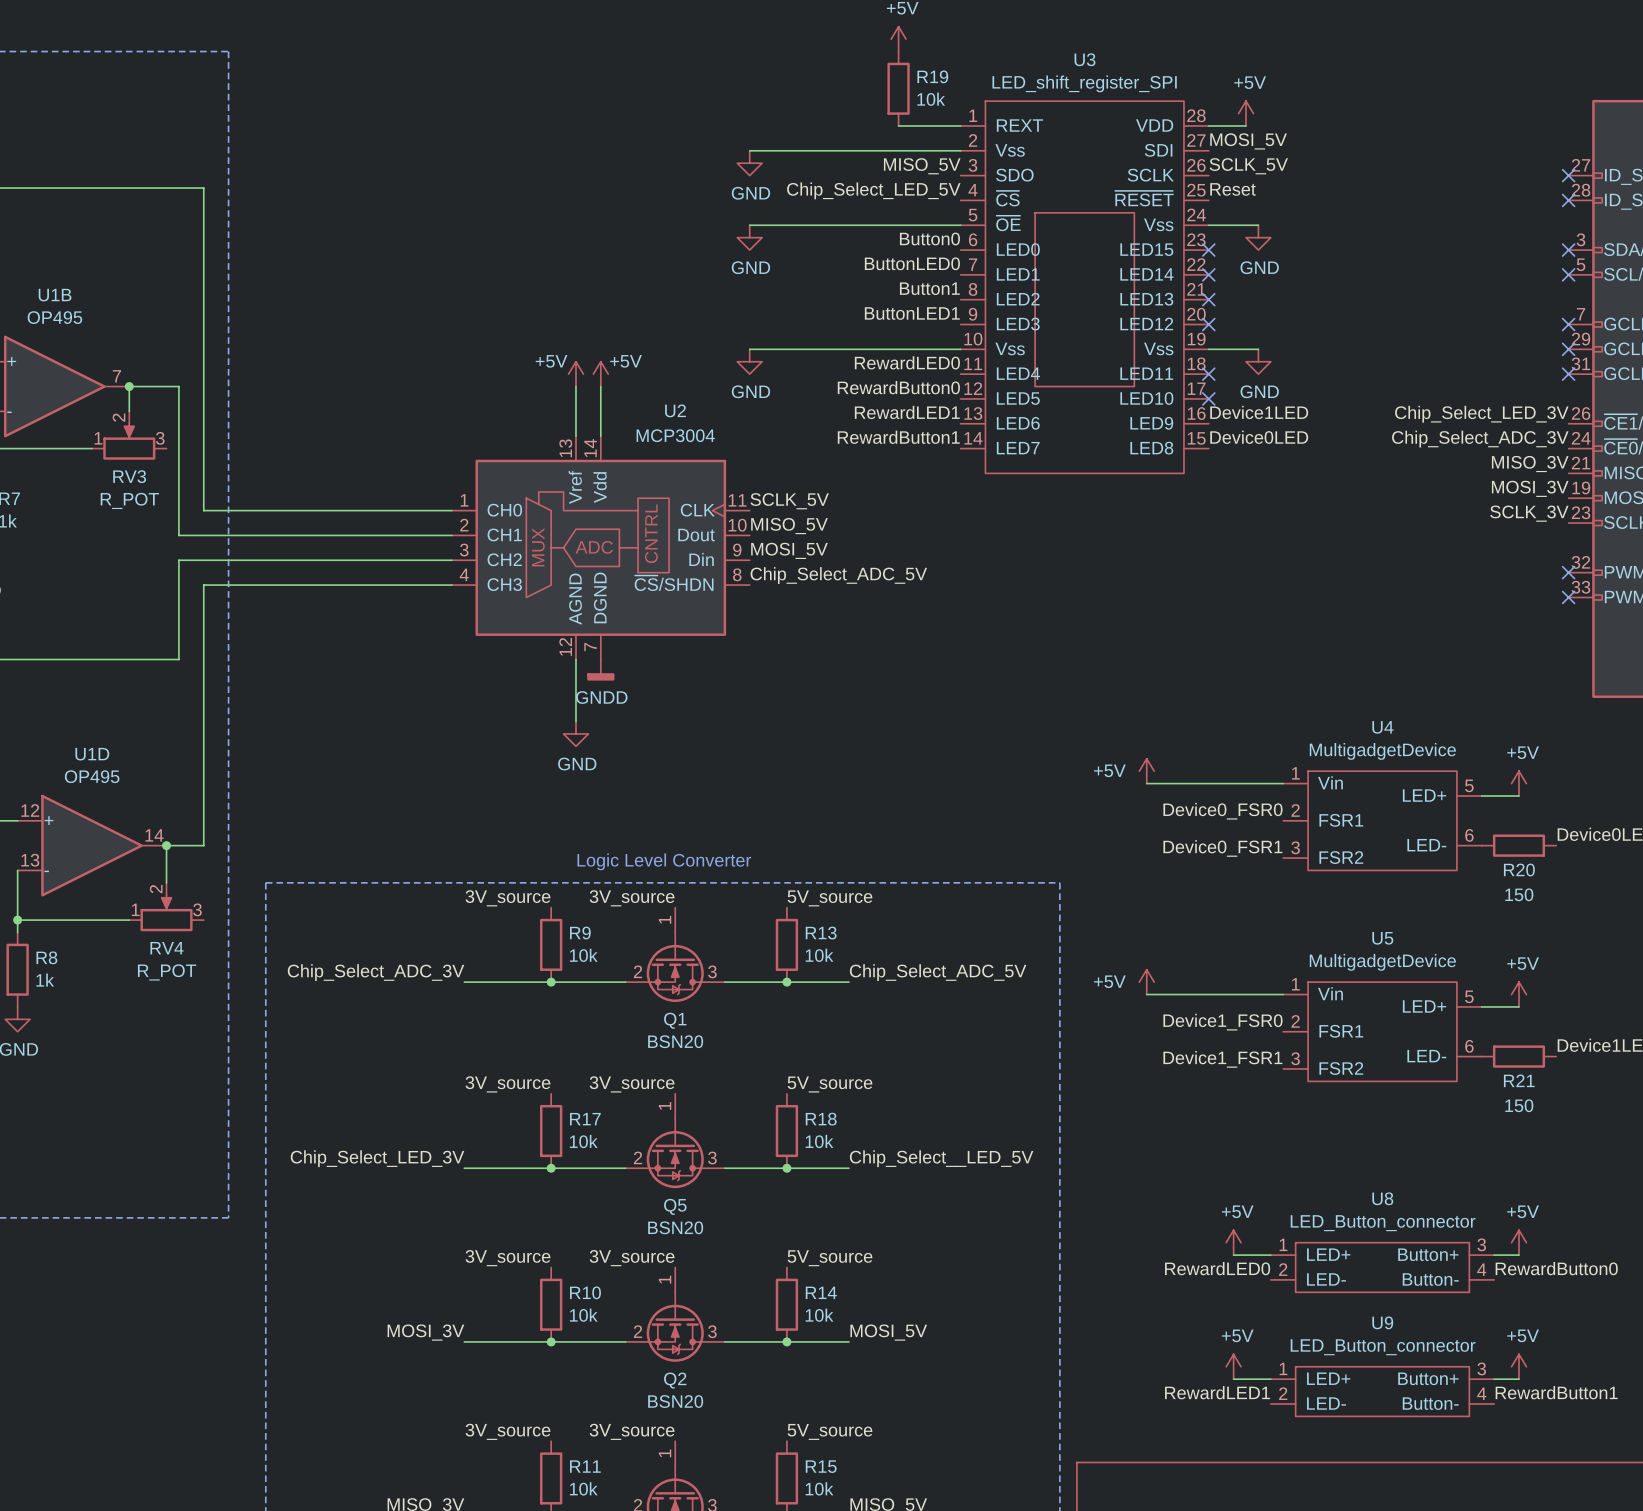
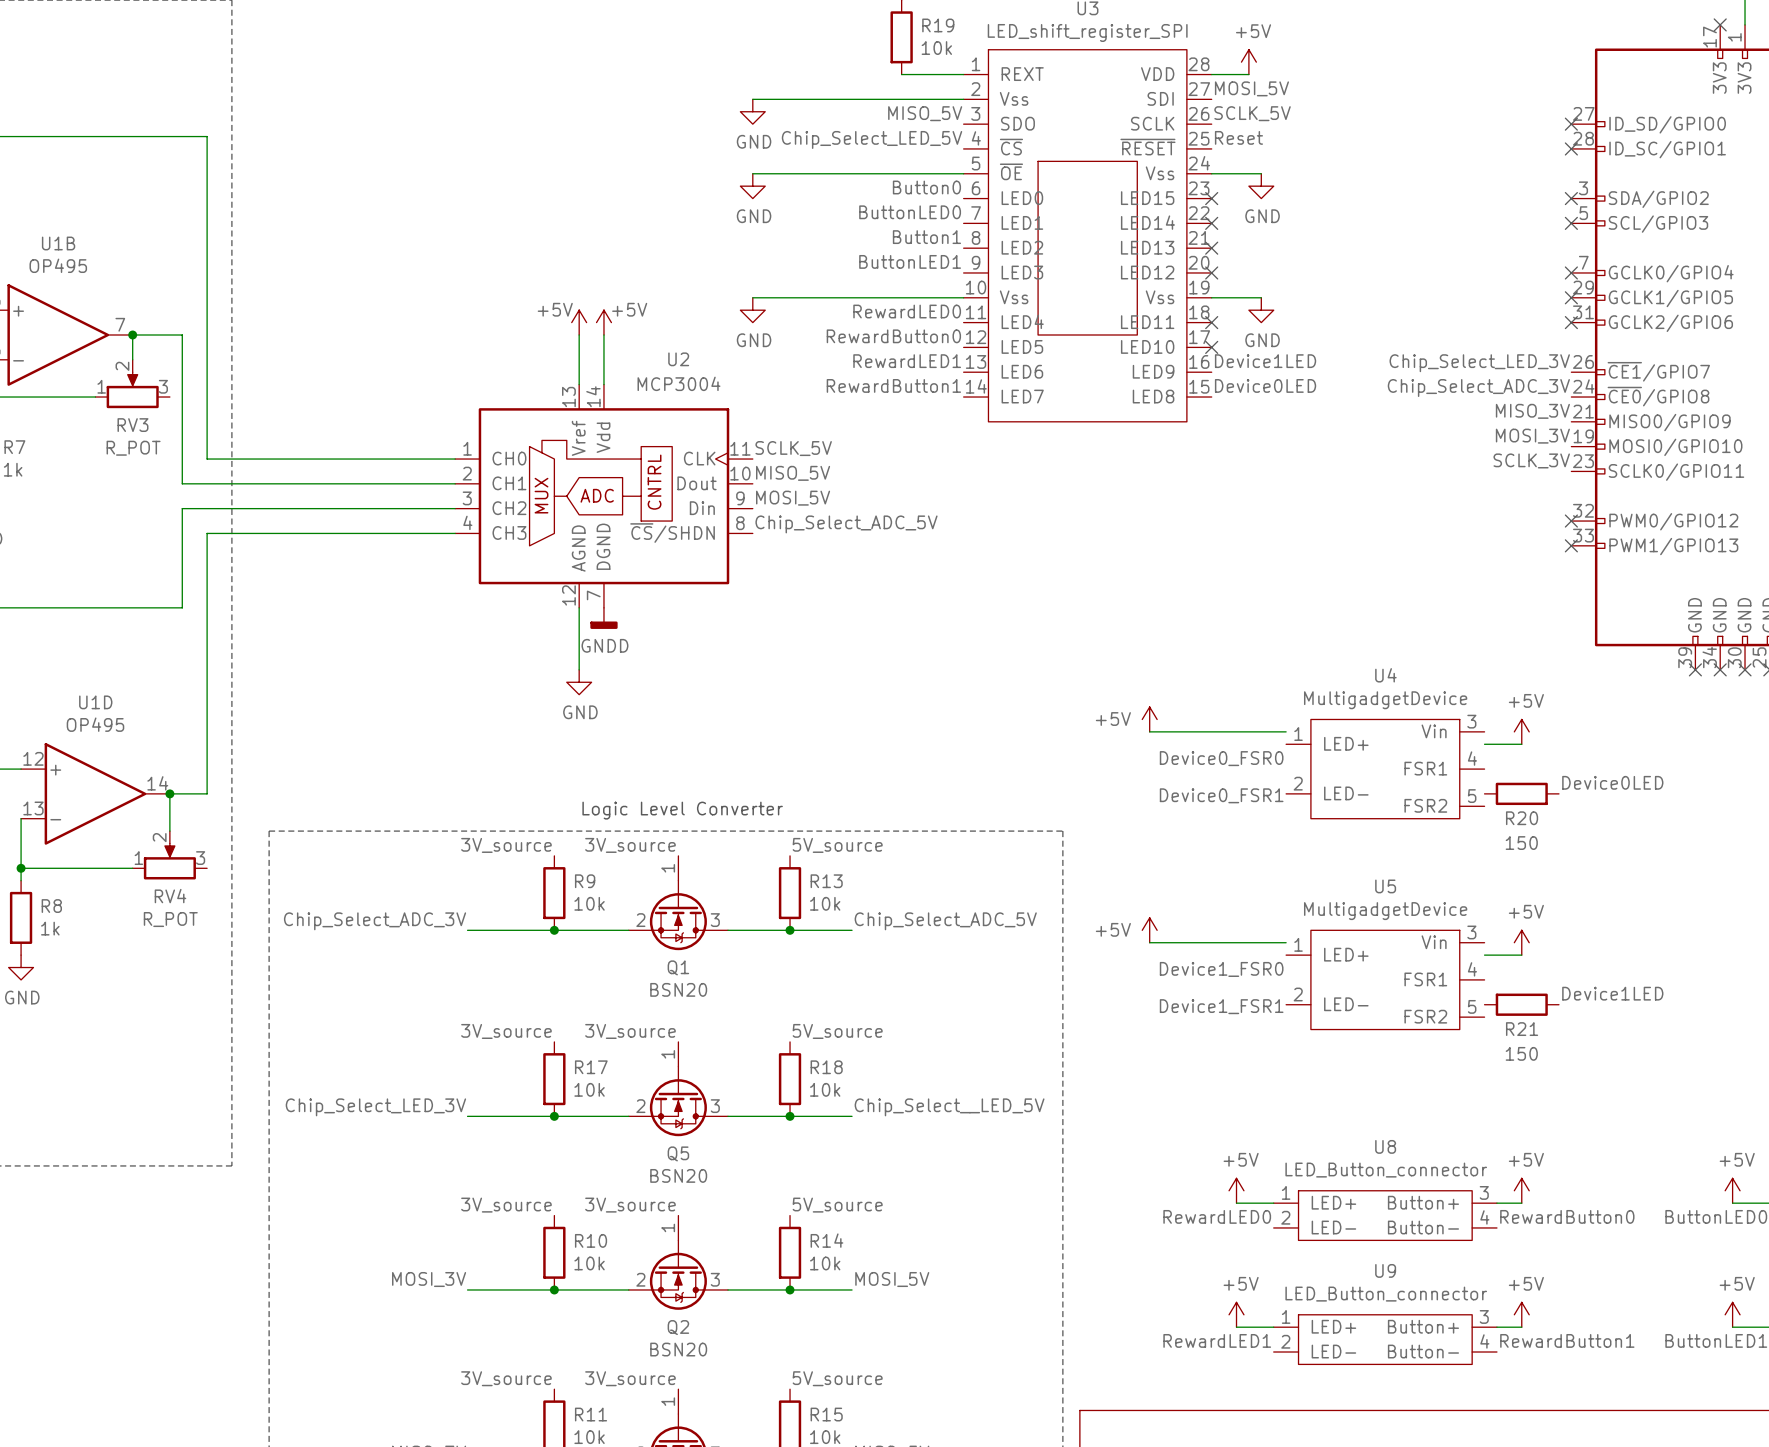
U4 symbol: [1283, 771, 1482, 871] -> [1286, 719, 1485, 819]
U5 symbol: [1283, 982, 1482, 1082] -> [1286, 930, 1485, 1030]

